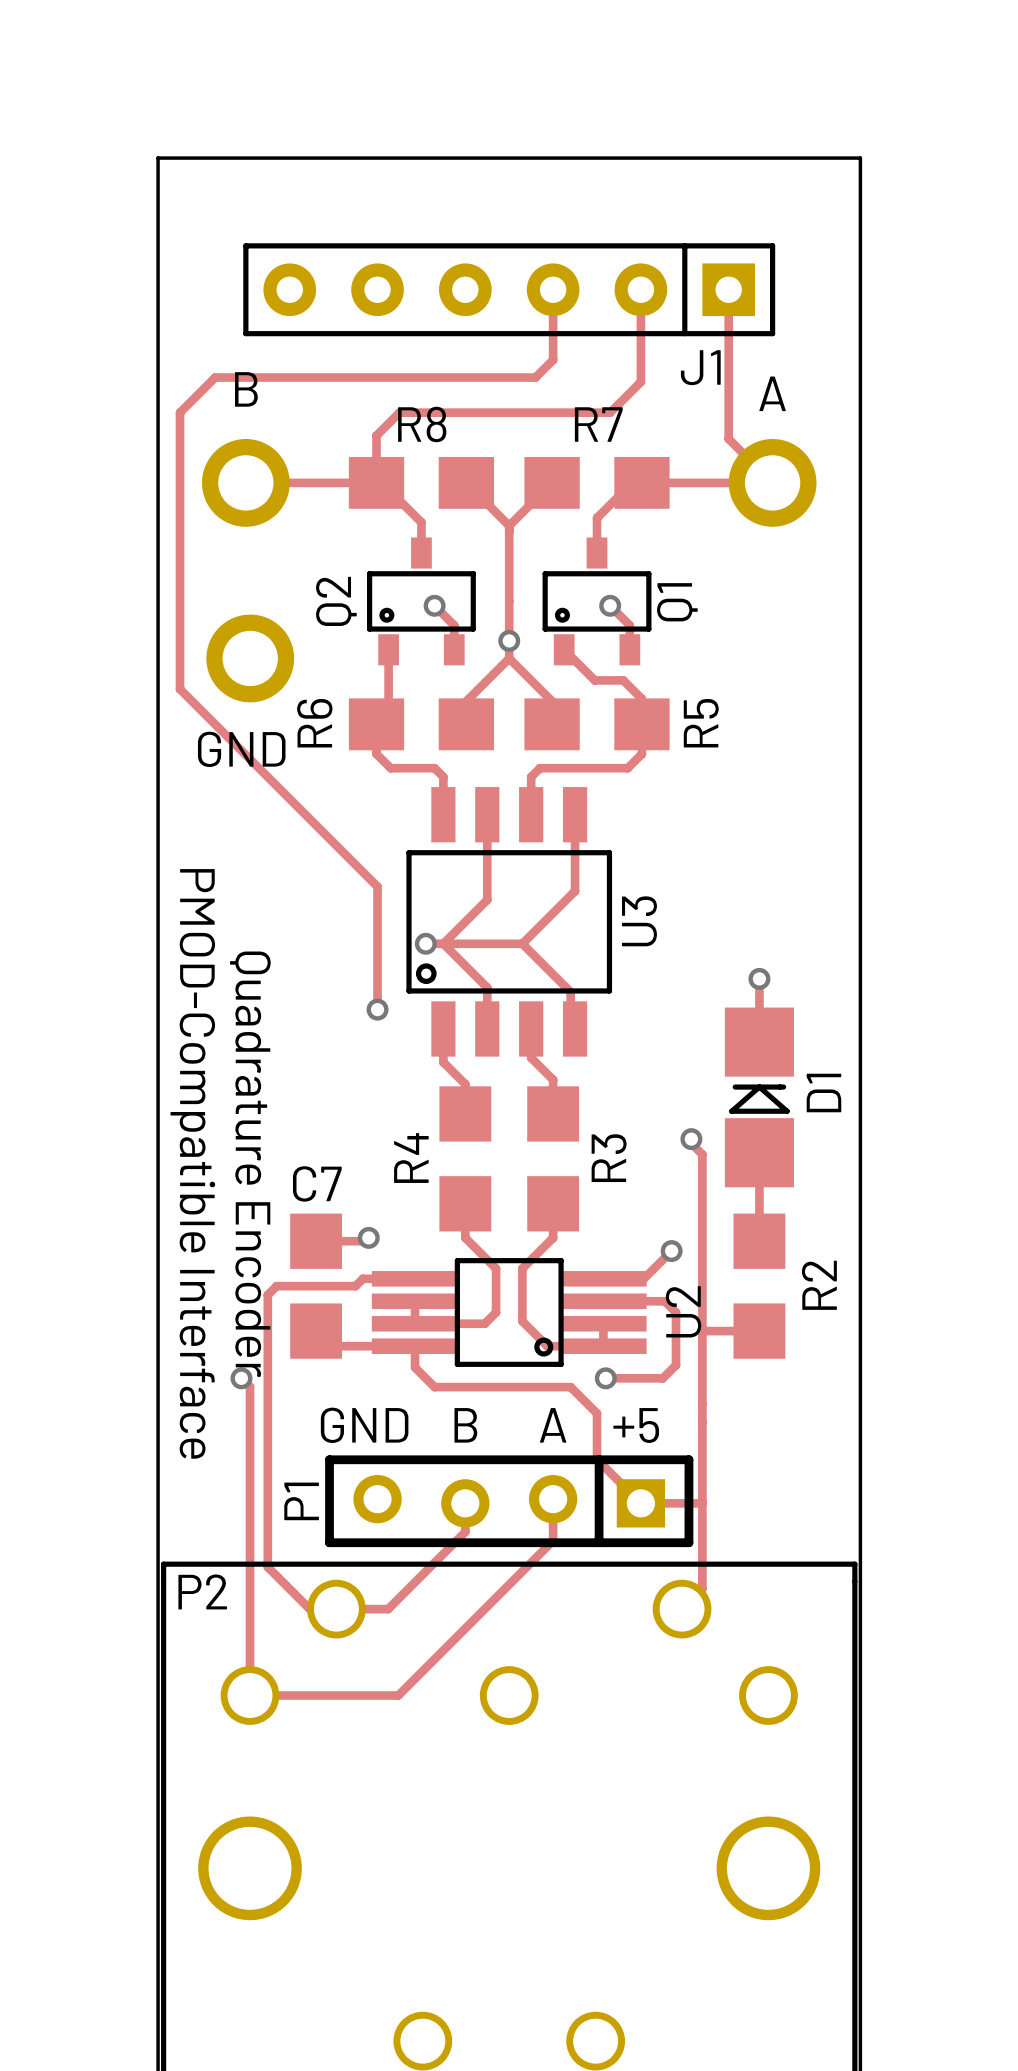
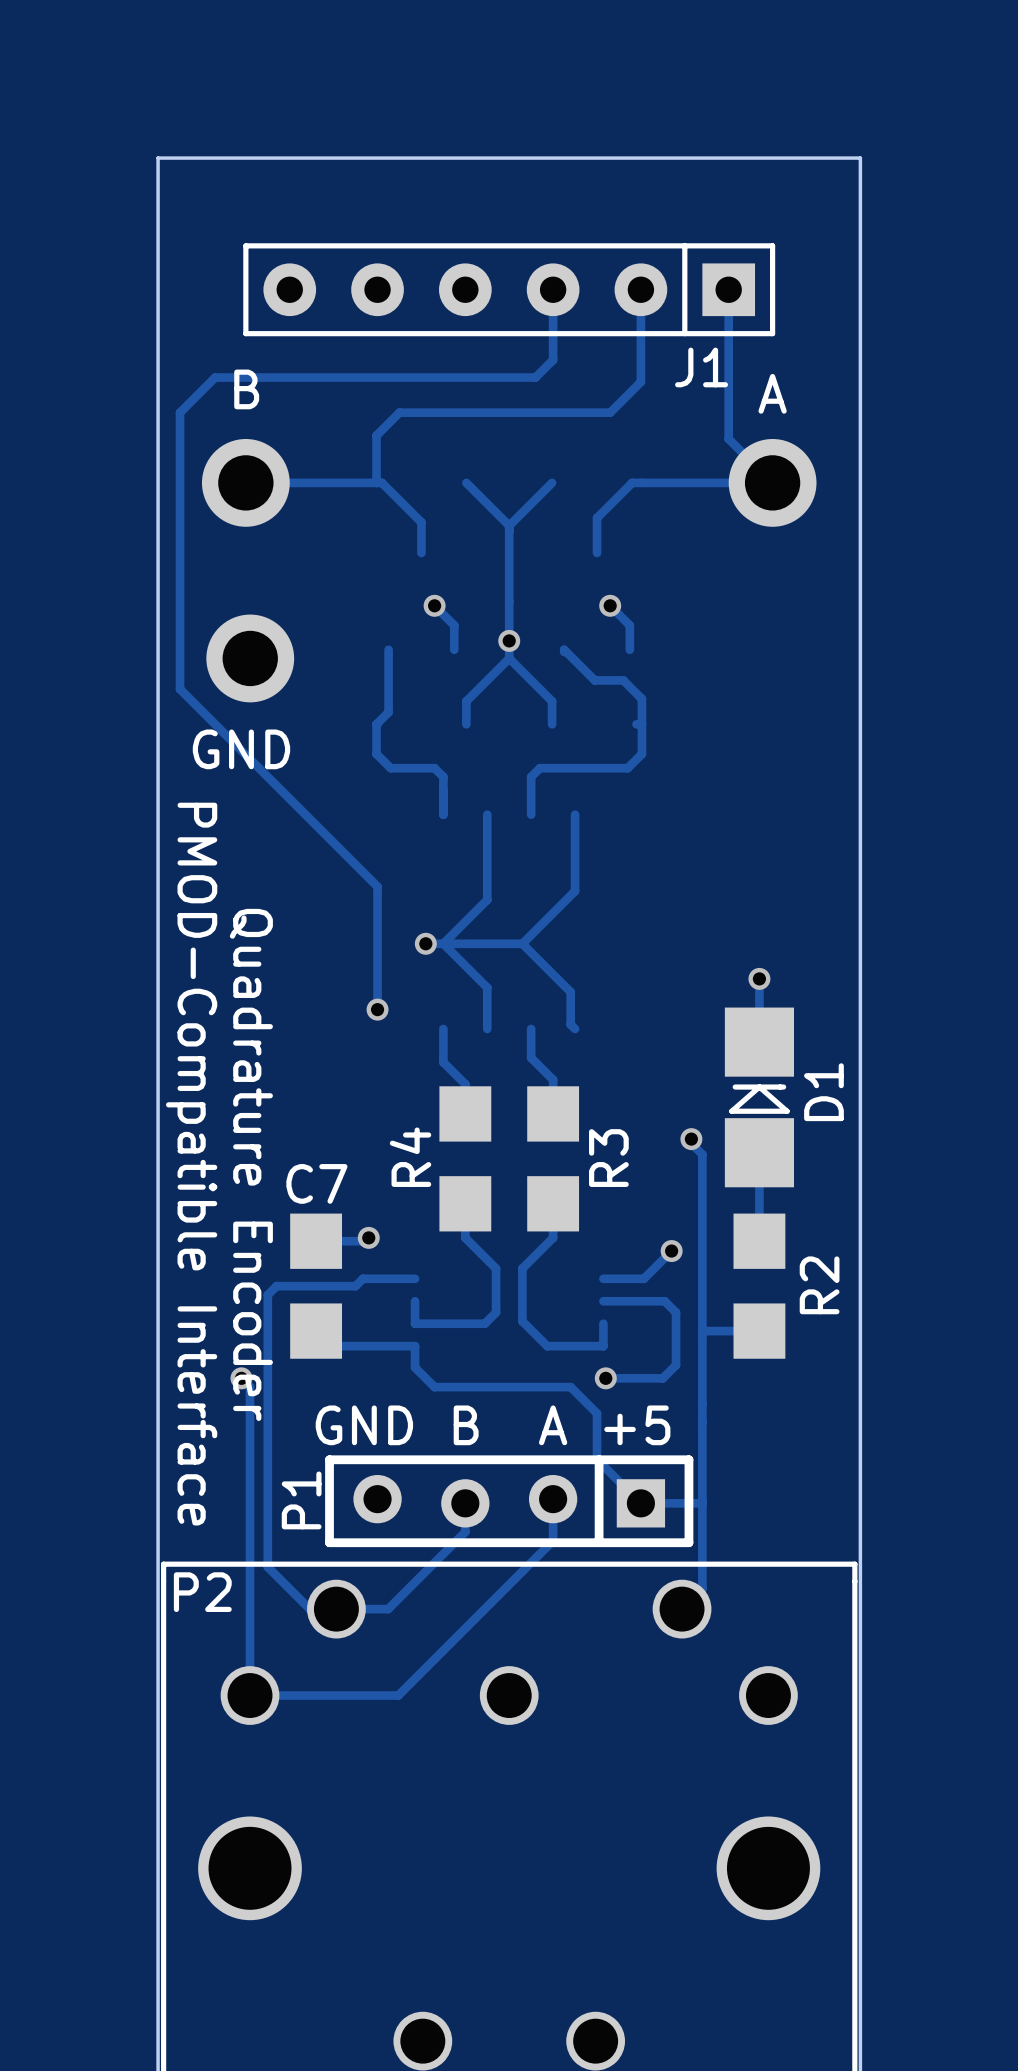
R8: (421, 482) -> none
R7: (597, 482) -> none
Q2: (421, 601) -> none
Q1: (597, 601) -> none
R6: (421, 724) -> none
R5: (597, 724) -> none
U3: (509, 921) -> none
U2: (509, 1312) -> none

